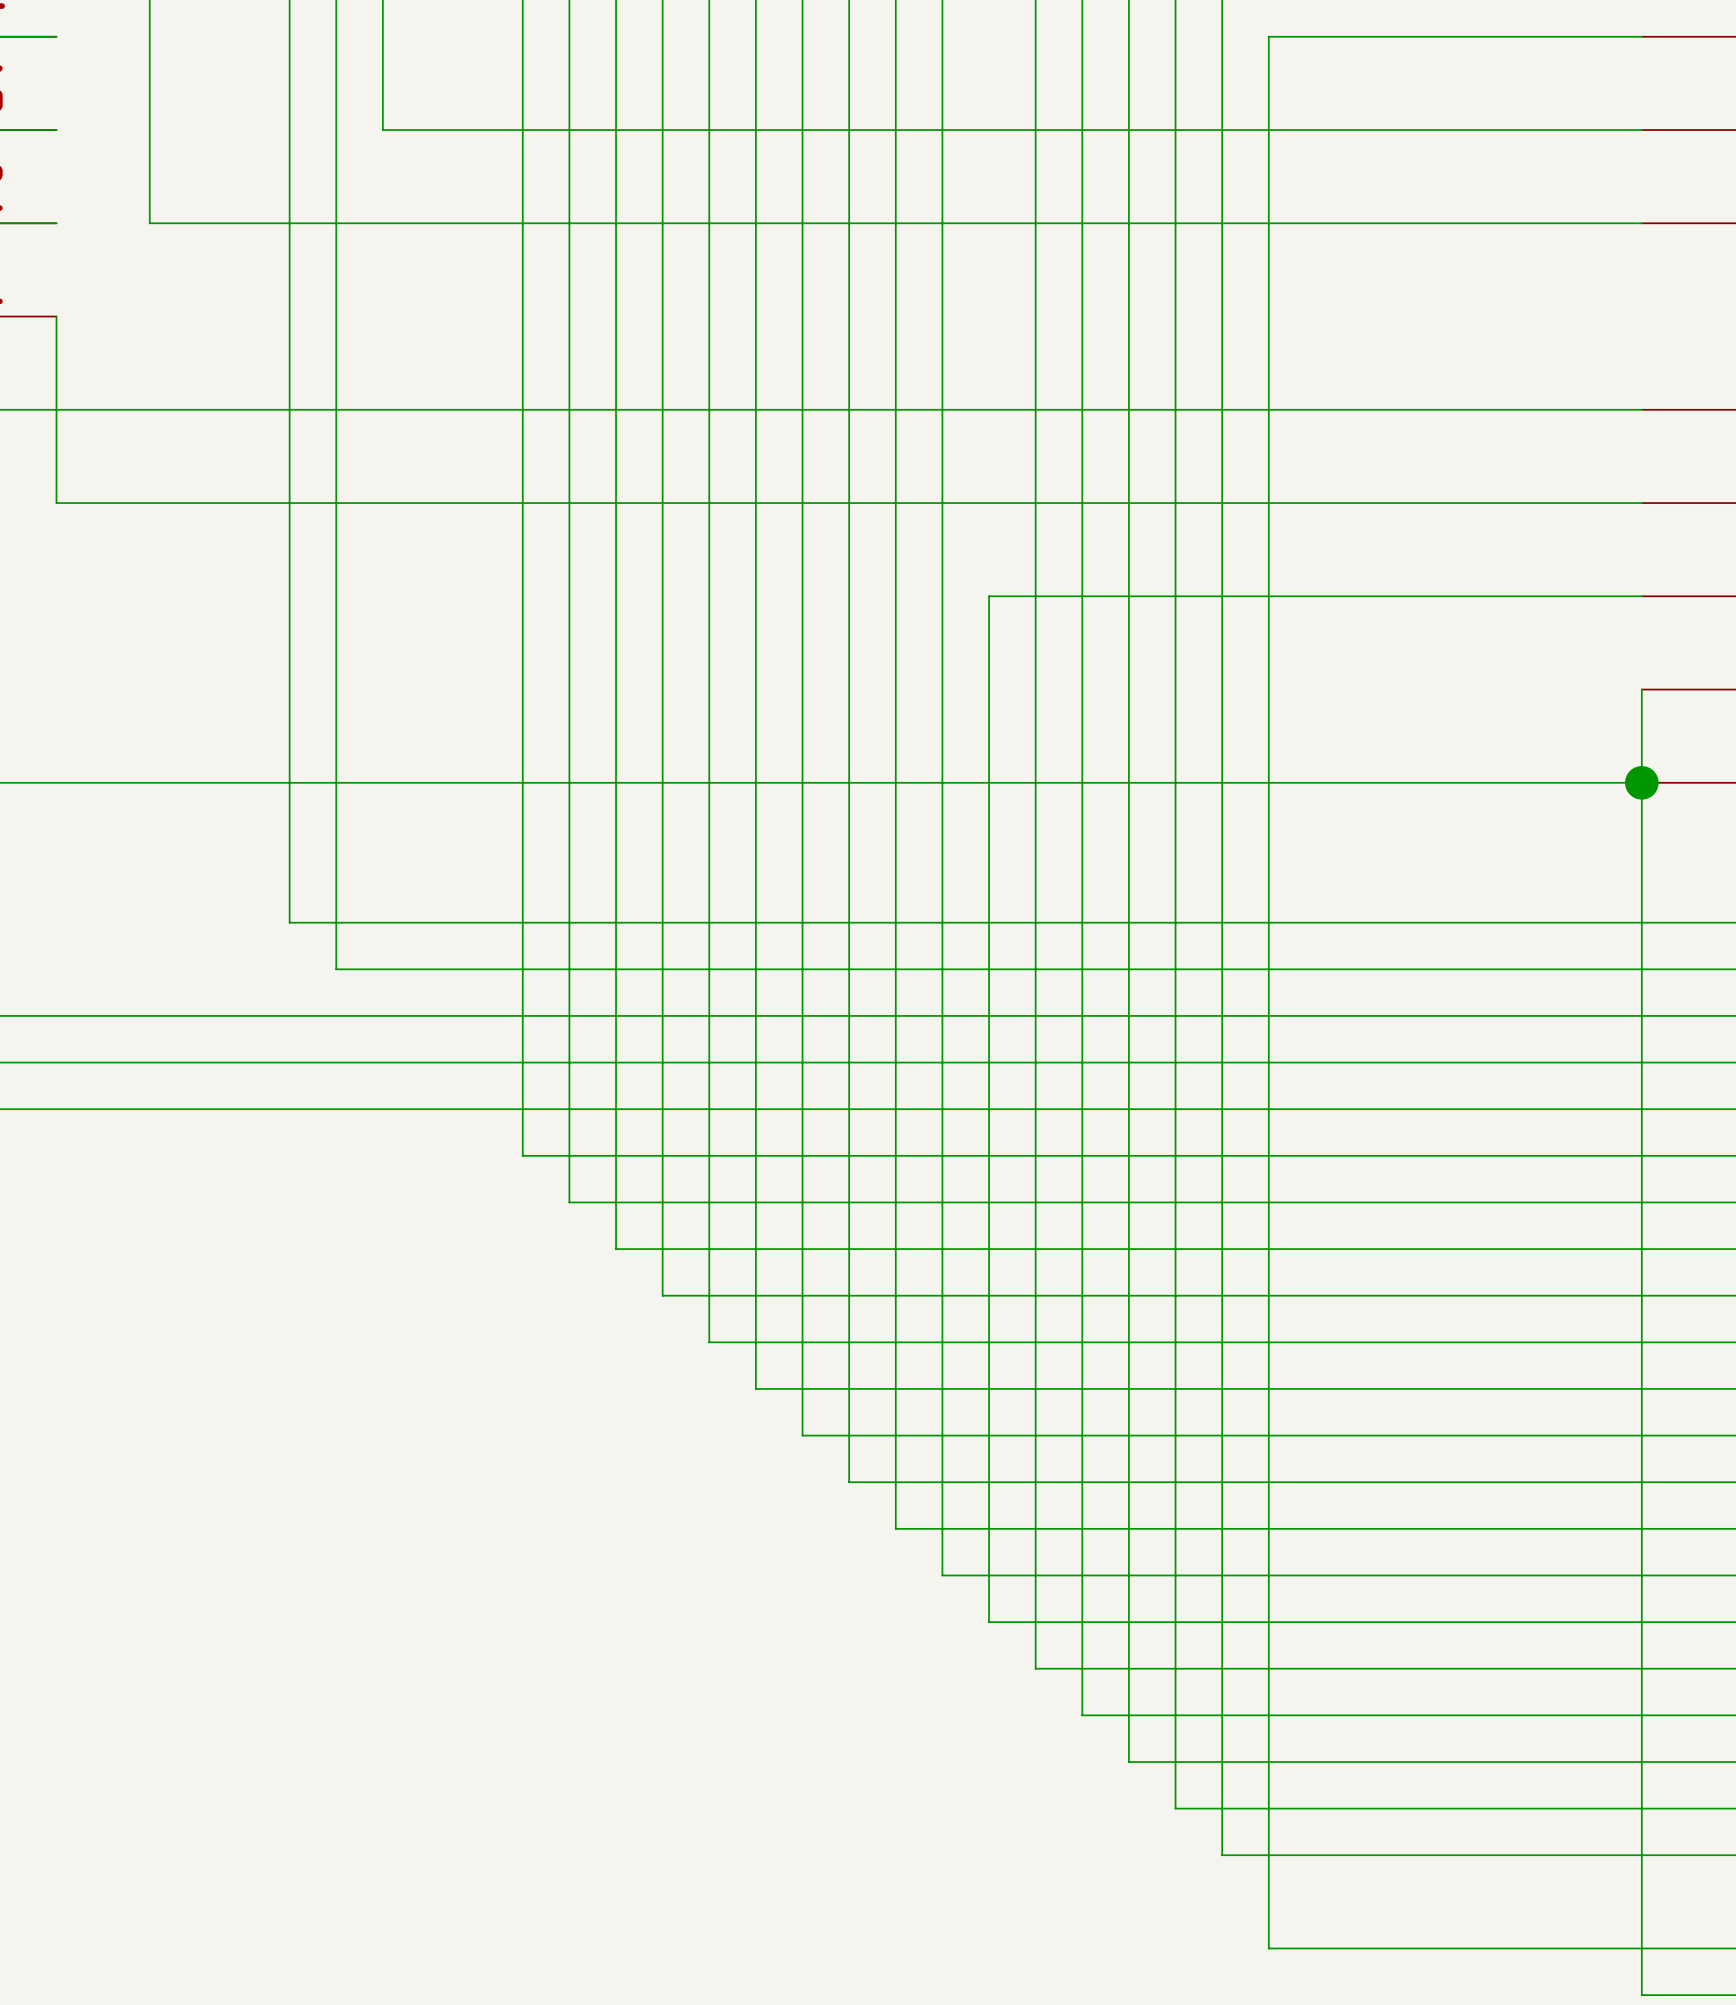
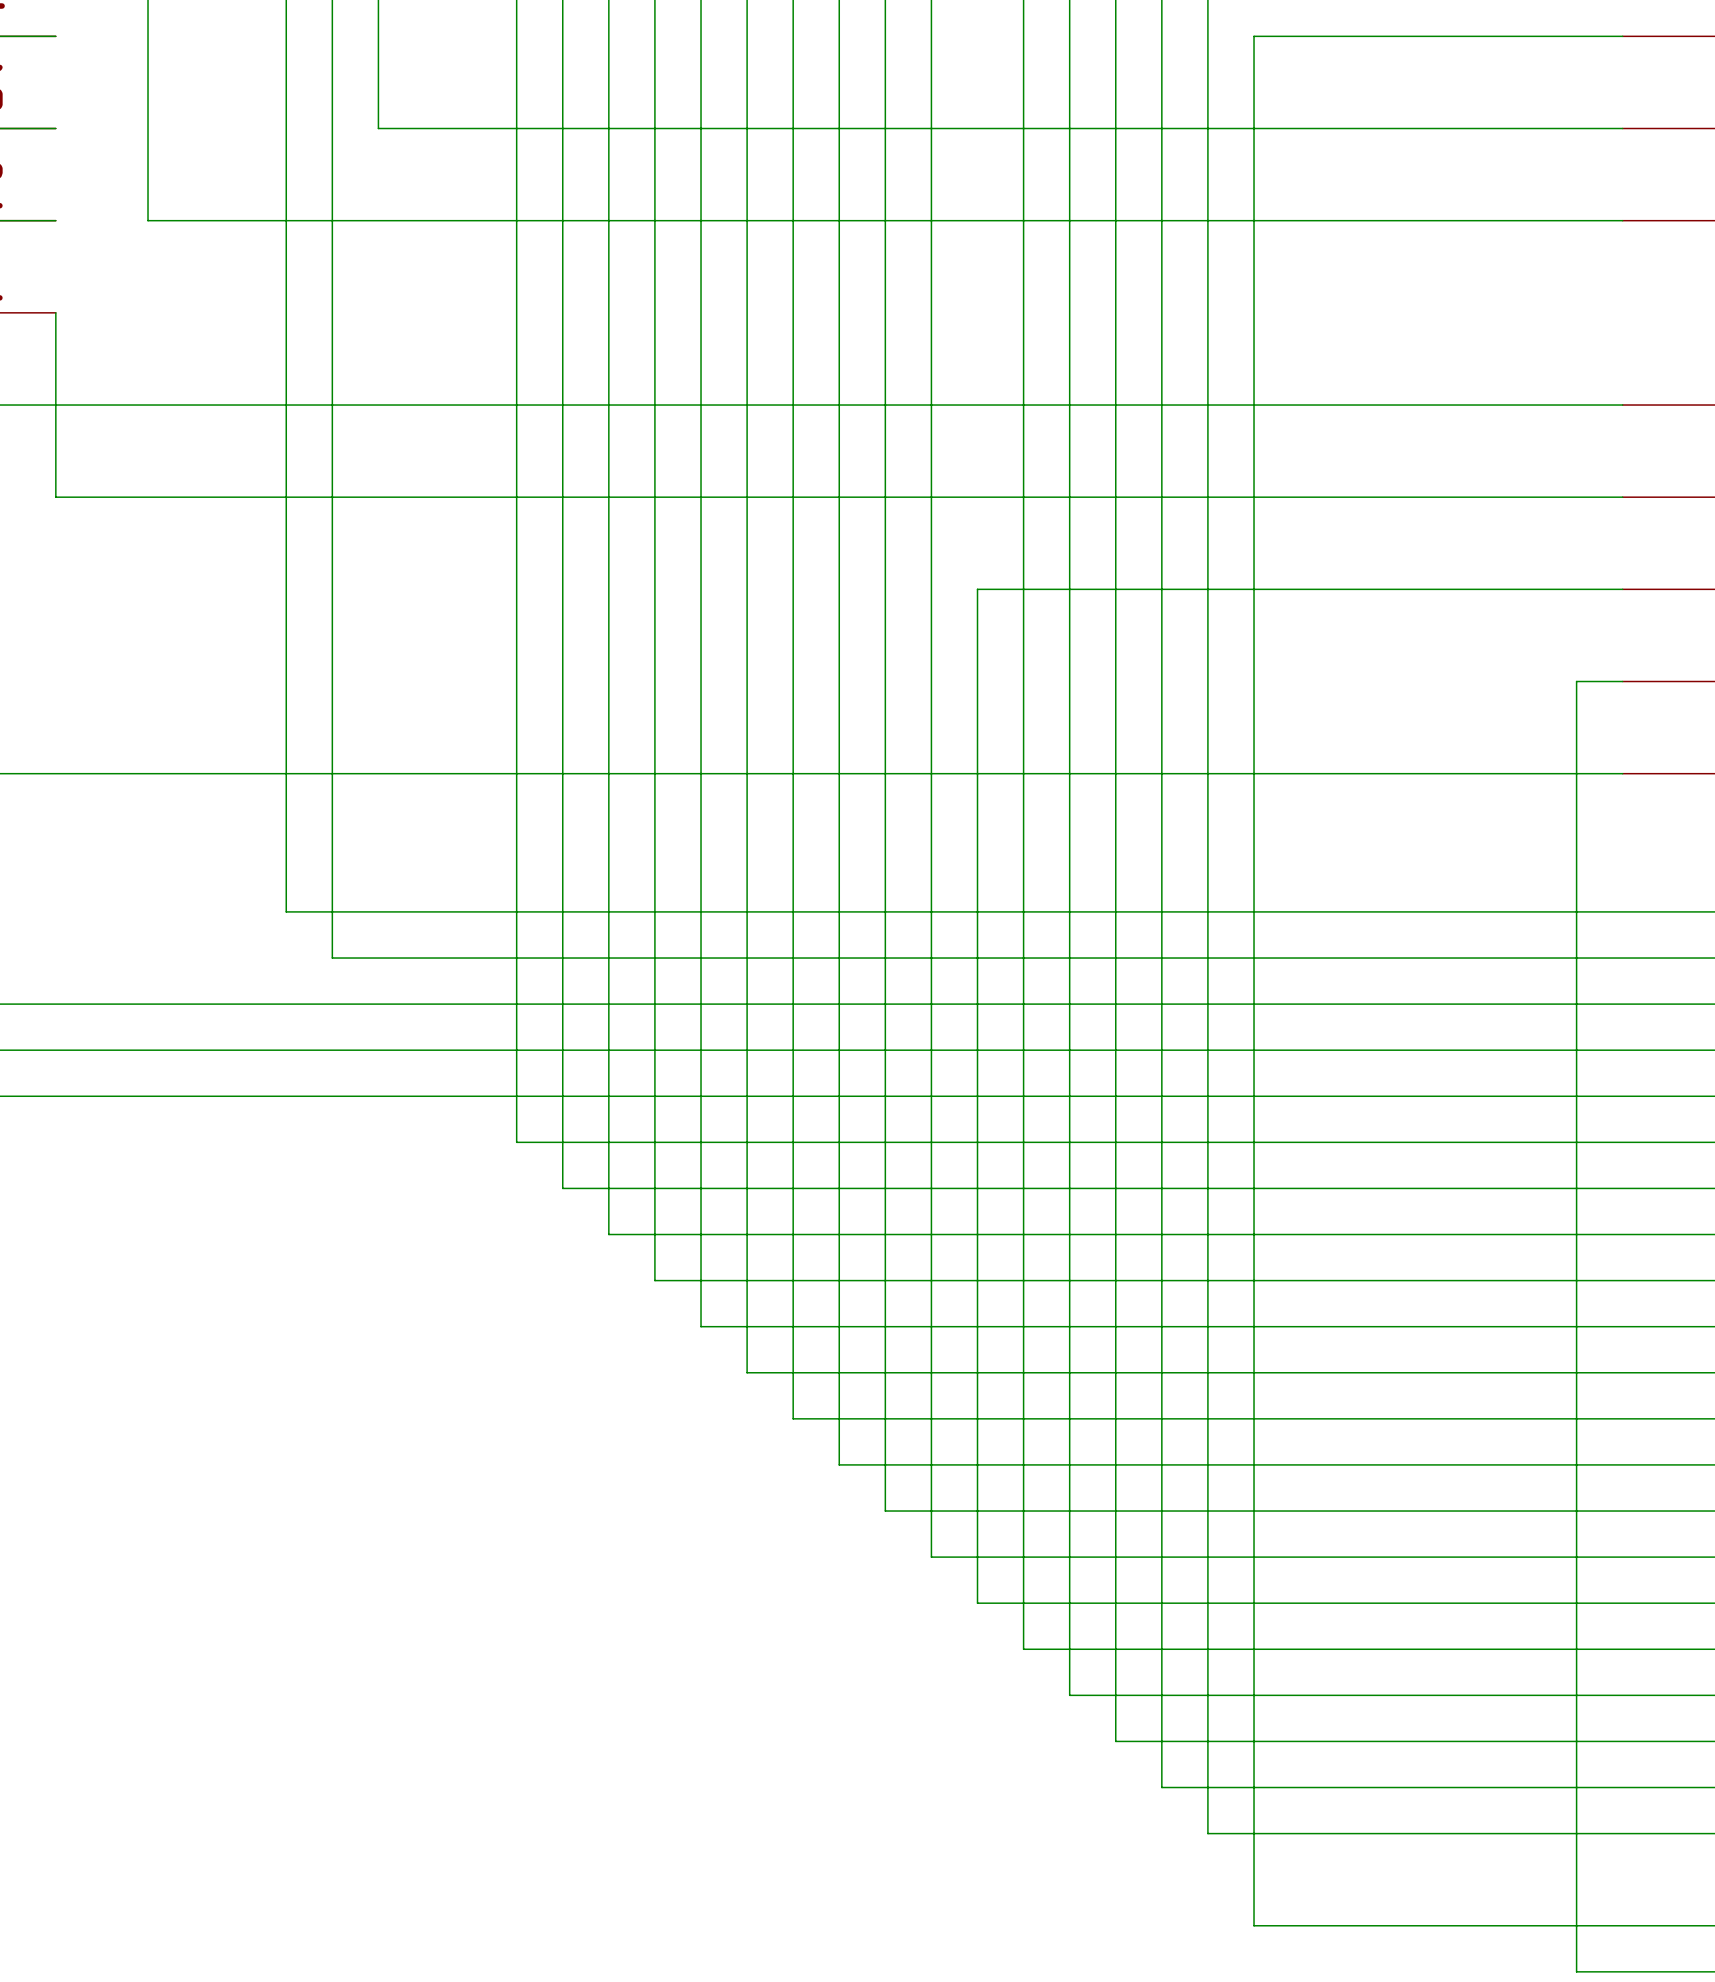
wire: (1641, 689) (1641, 1995) -> (1622, 681) (1576, 681) (1576, 1971) (1622, 1971)
junction: (1641, 782) -> none

